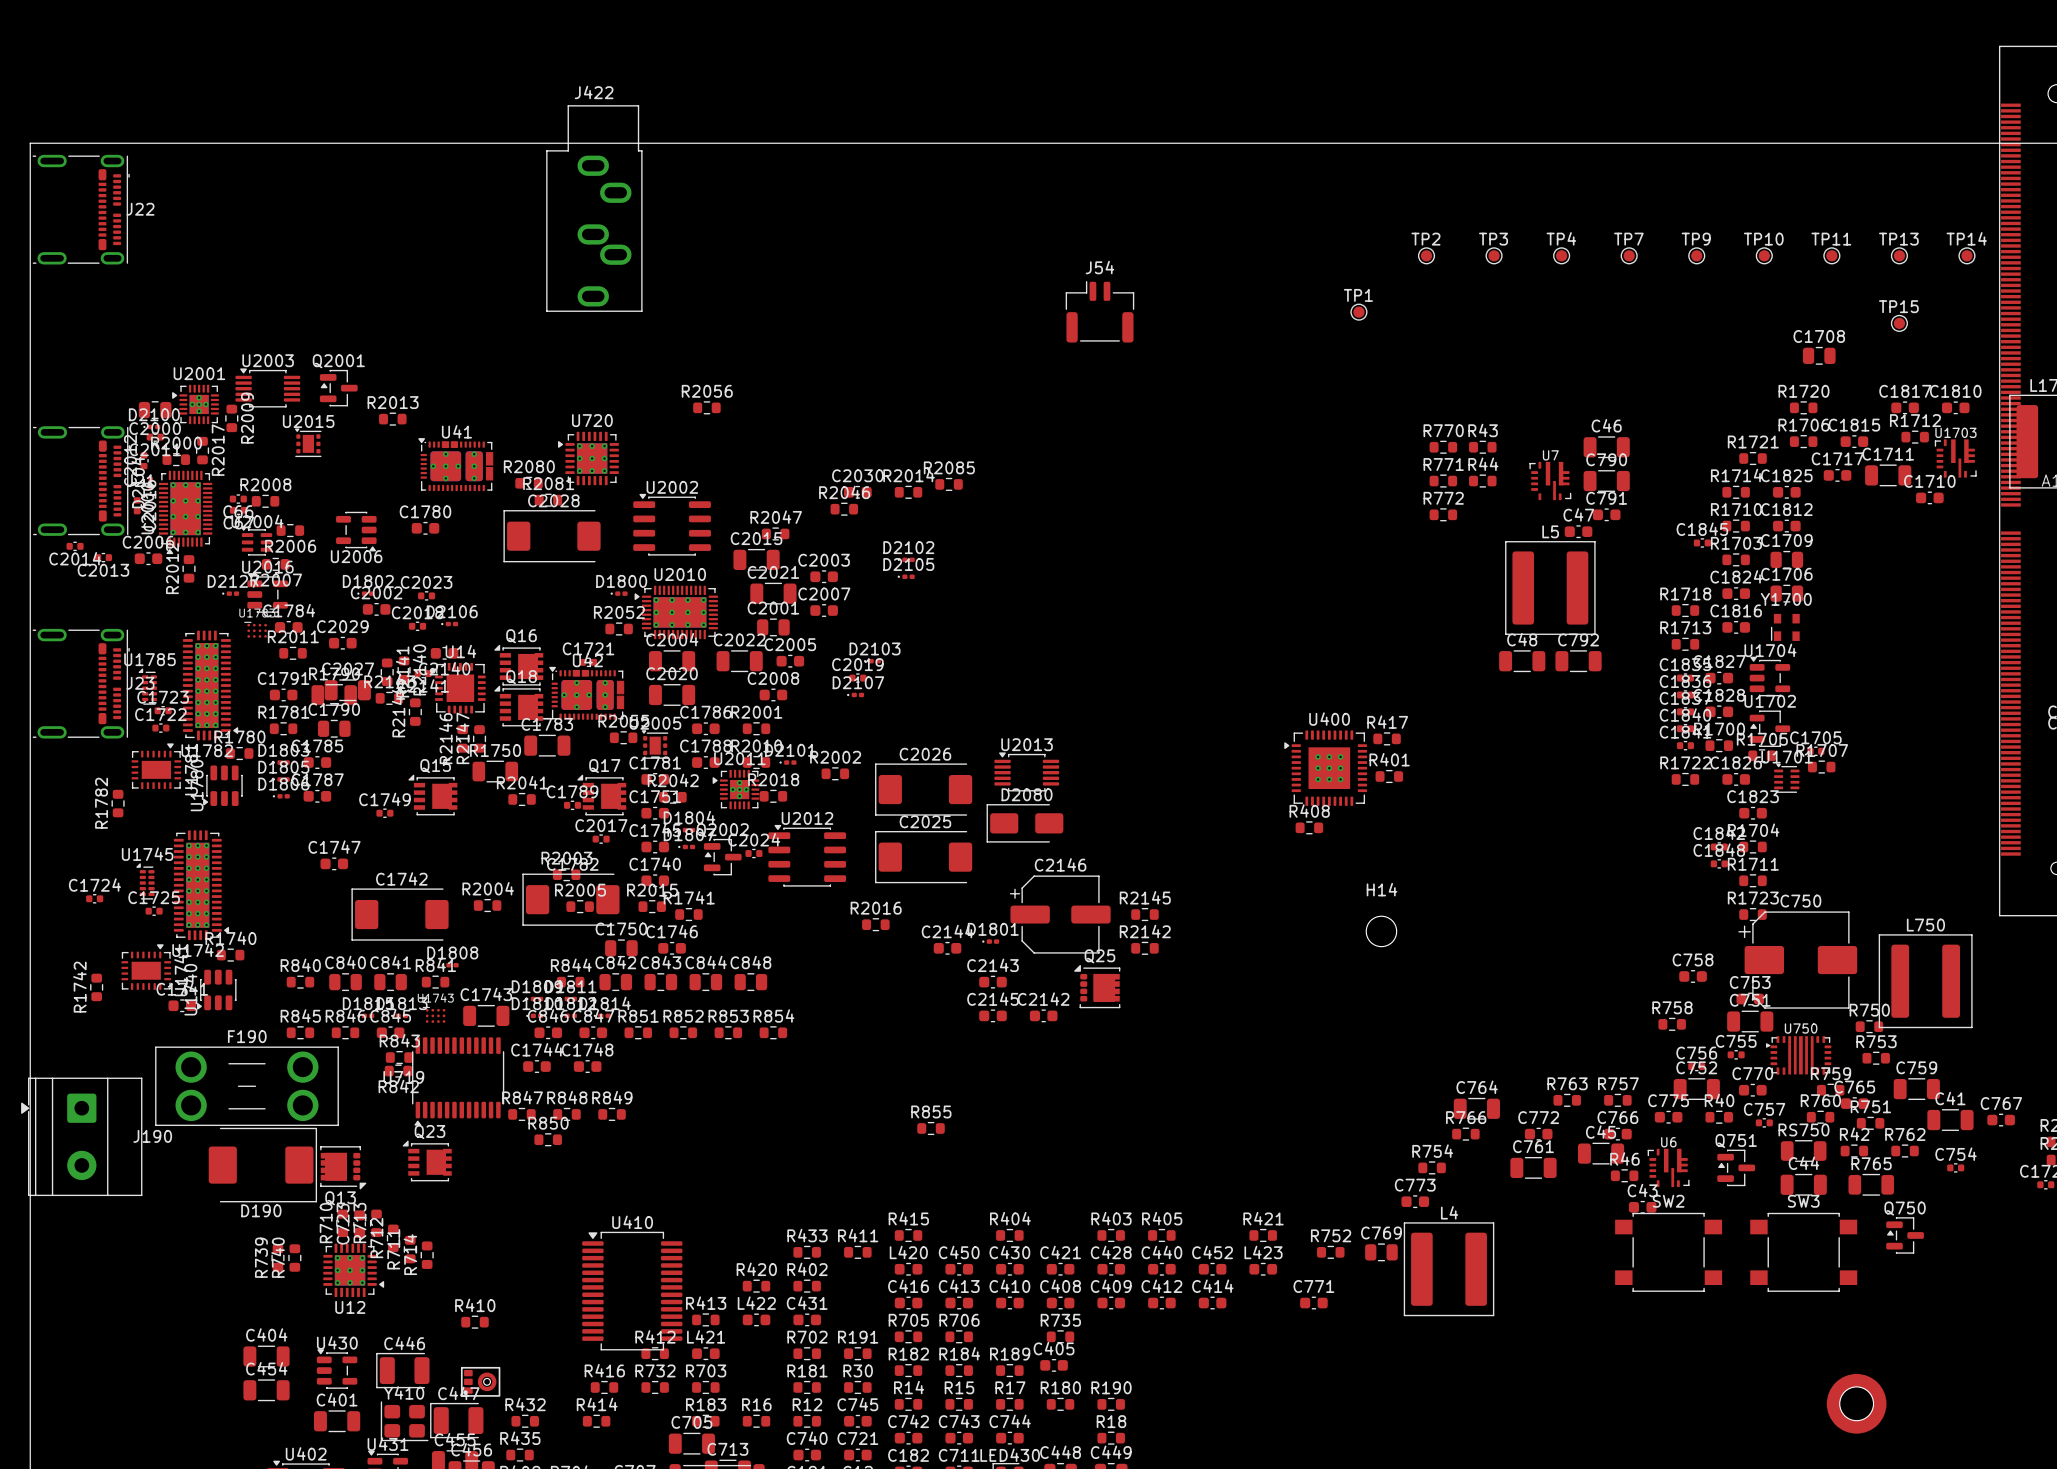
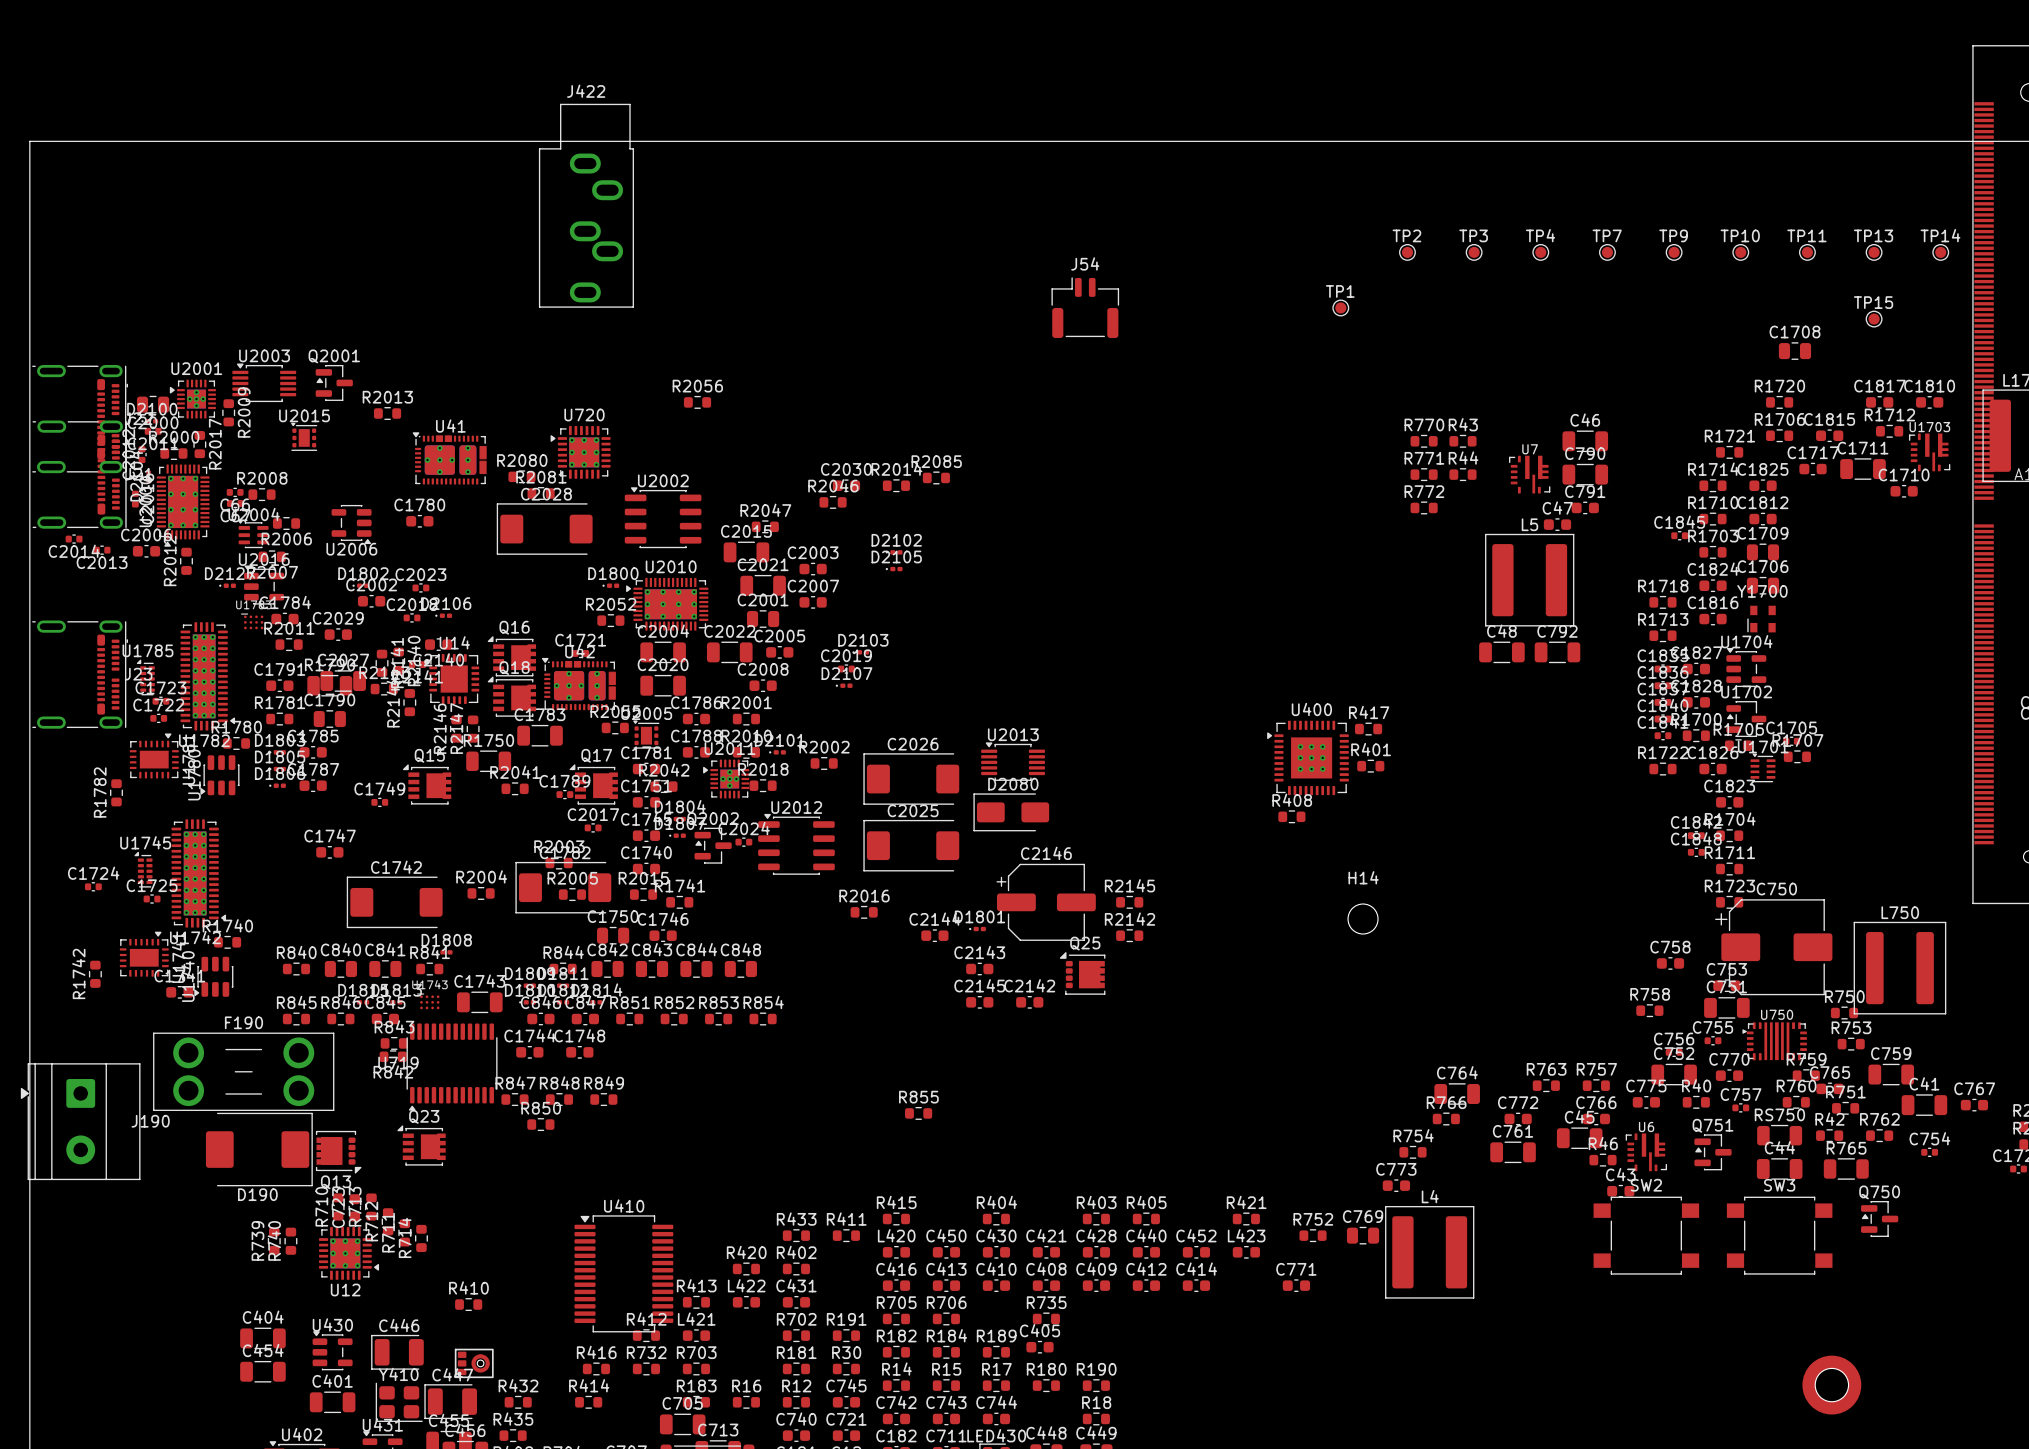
J22 position: (81, 209) -> (80, 419)

